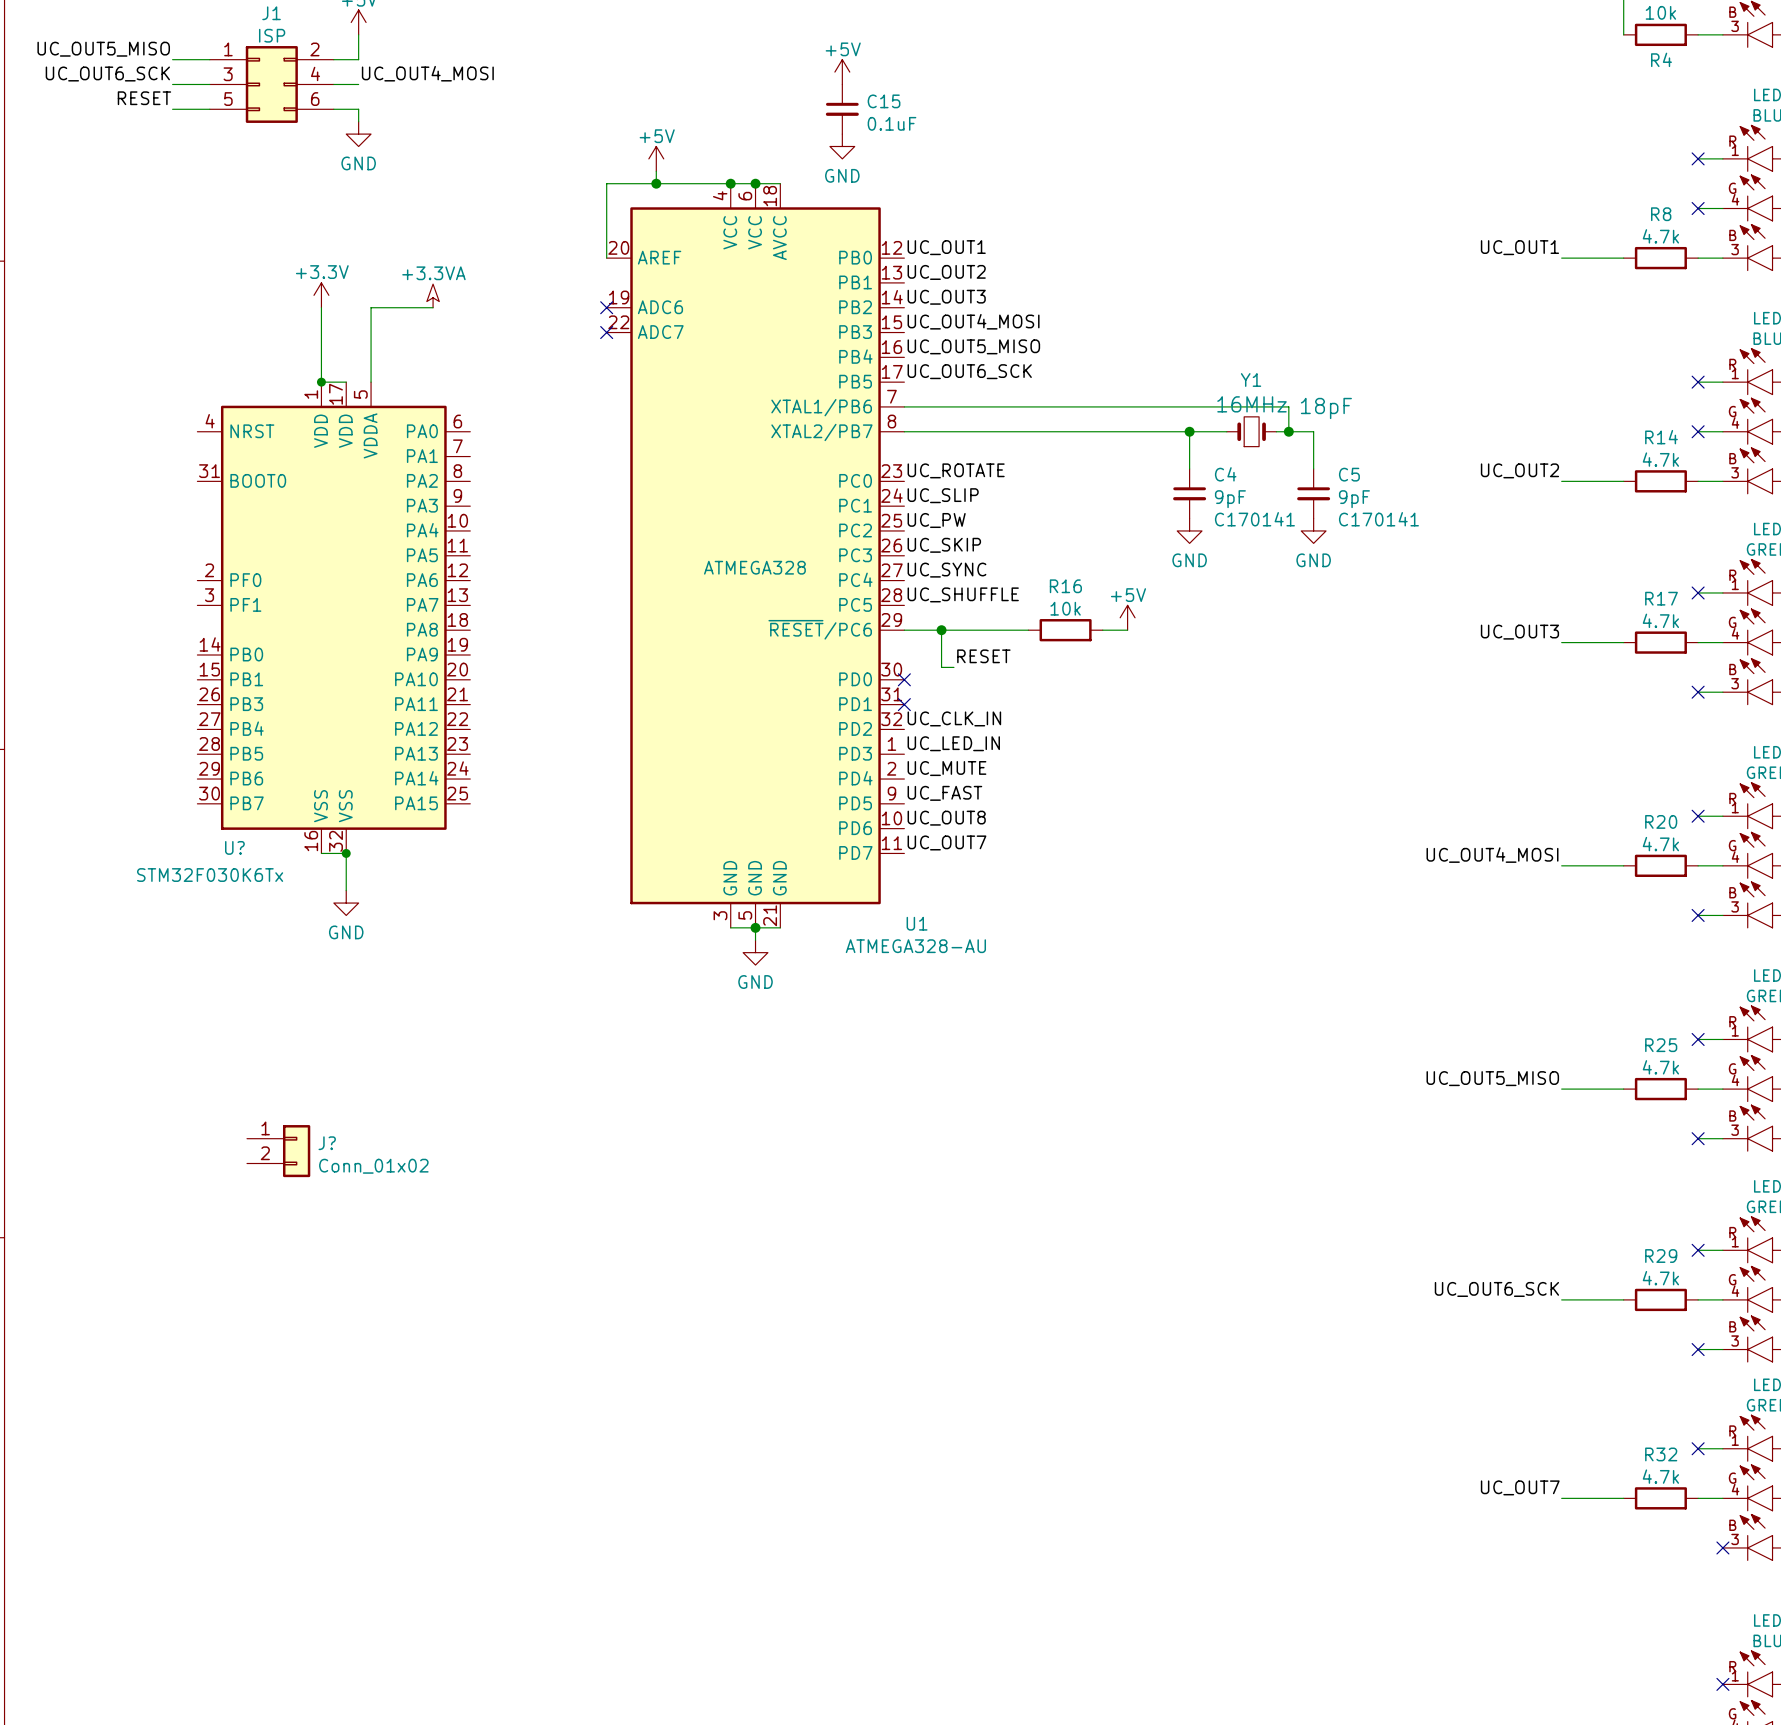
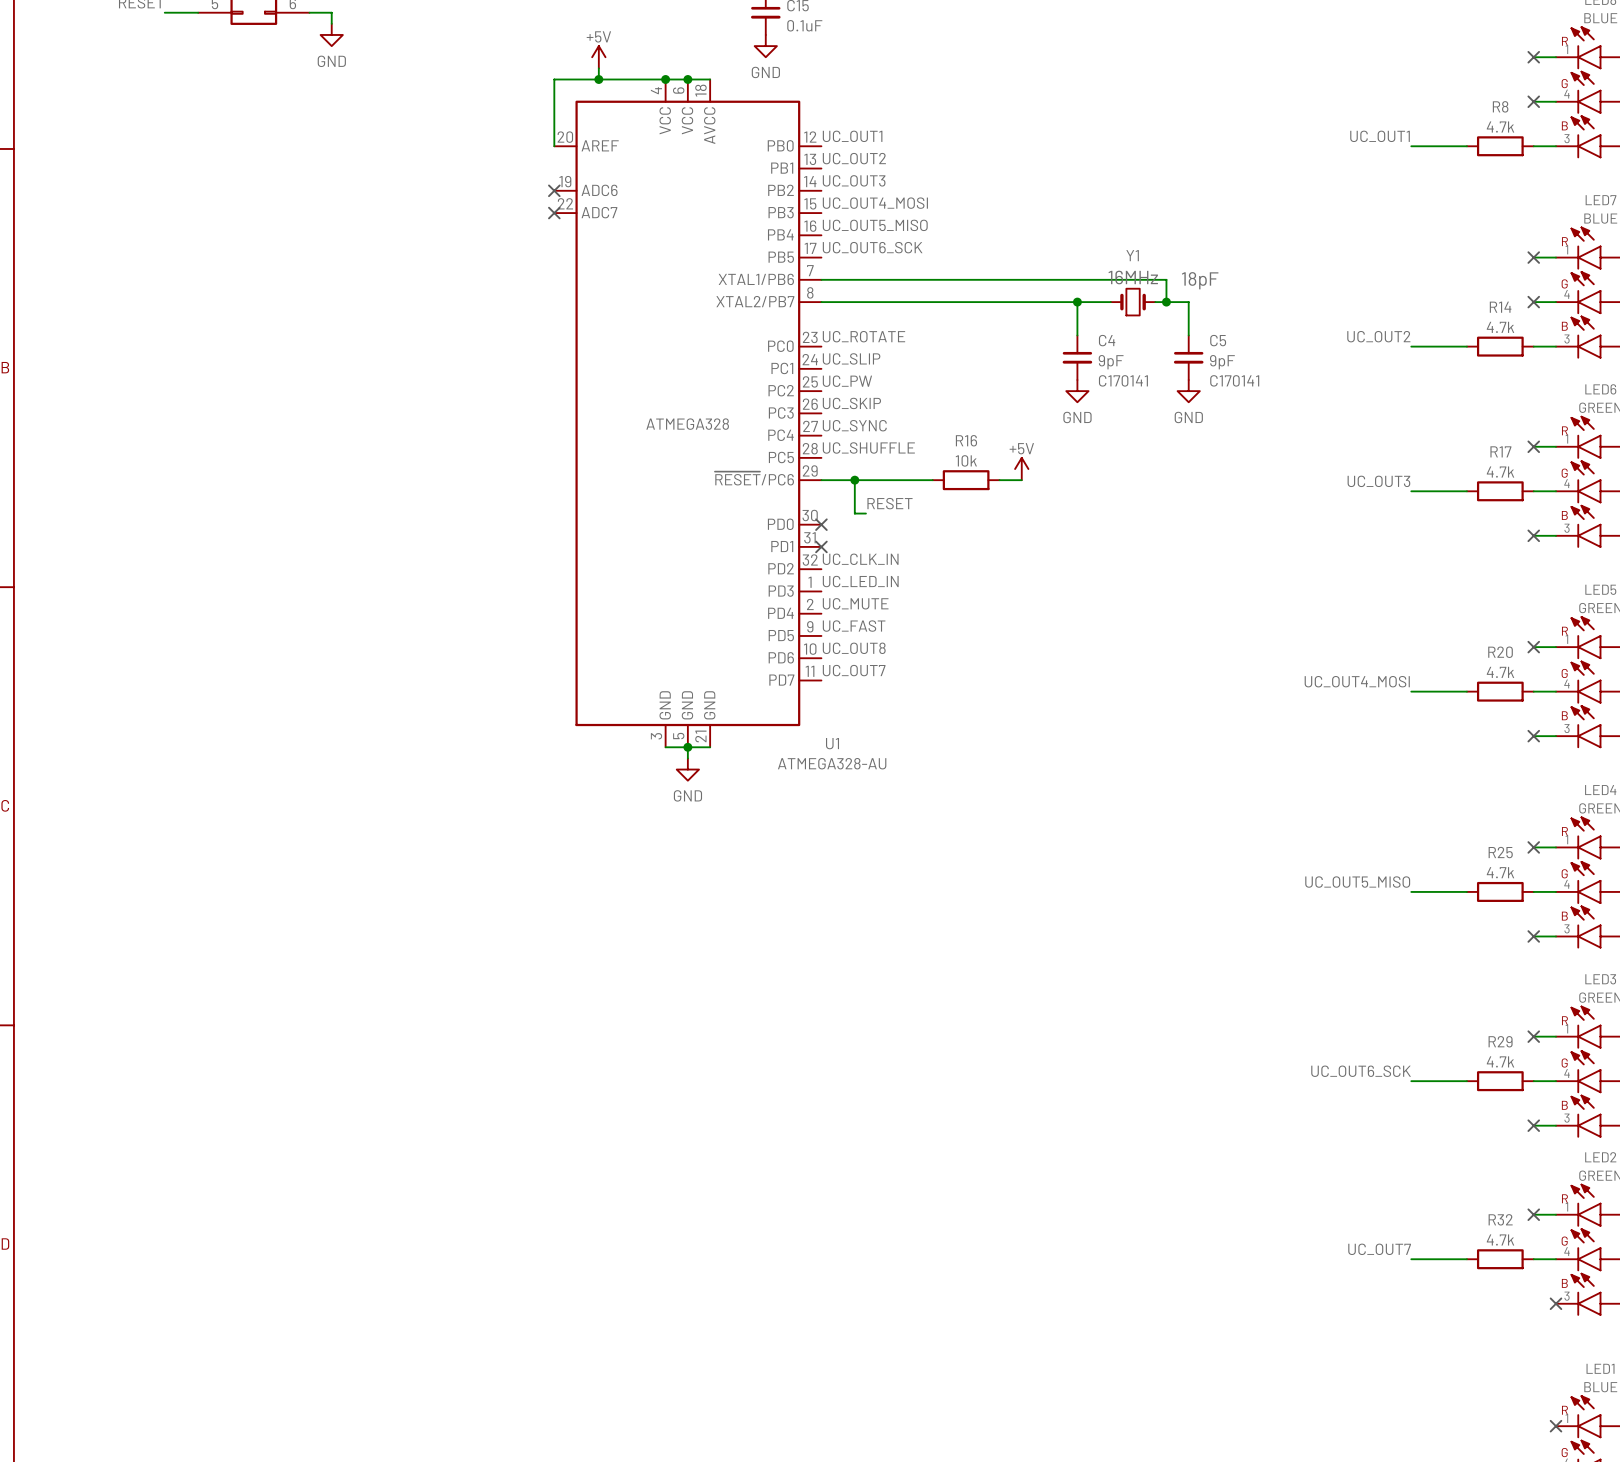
power symbol: +3.3V (321, 295) -> none
power symbol: +3.3VA (433, 295) -> none
wire: (321, 307) (321, 382) (346, 382) -> none
wire: (433, 307) (371, 307) (371, 382) -> none
junction: (321, 382) -> none
U?: STM32F030K6Tx (333, 617) -> none
wire: (321, 853) (346, 853) (346, 890) -> none
junction: (346, 853) -> none
power symbol: GND (346, 903) -> none
J?: Conn_01x02 (278, 1151) -> none

